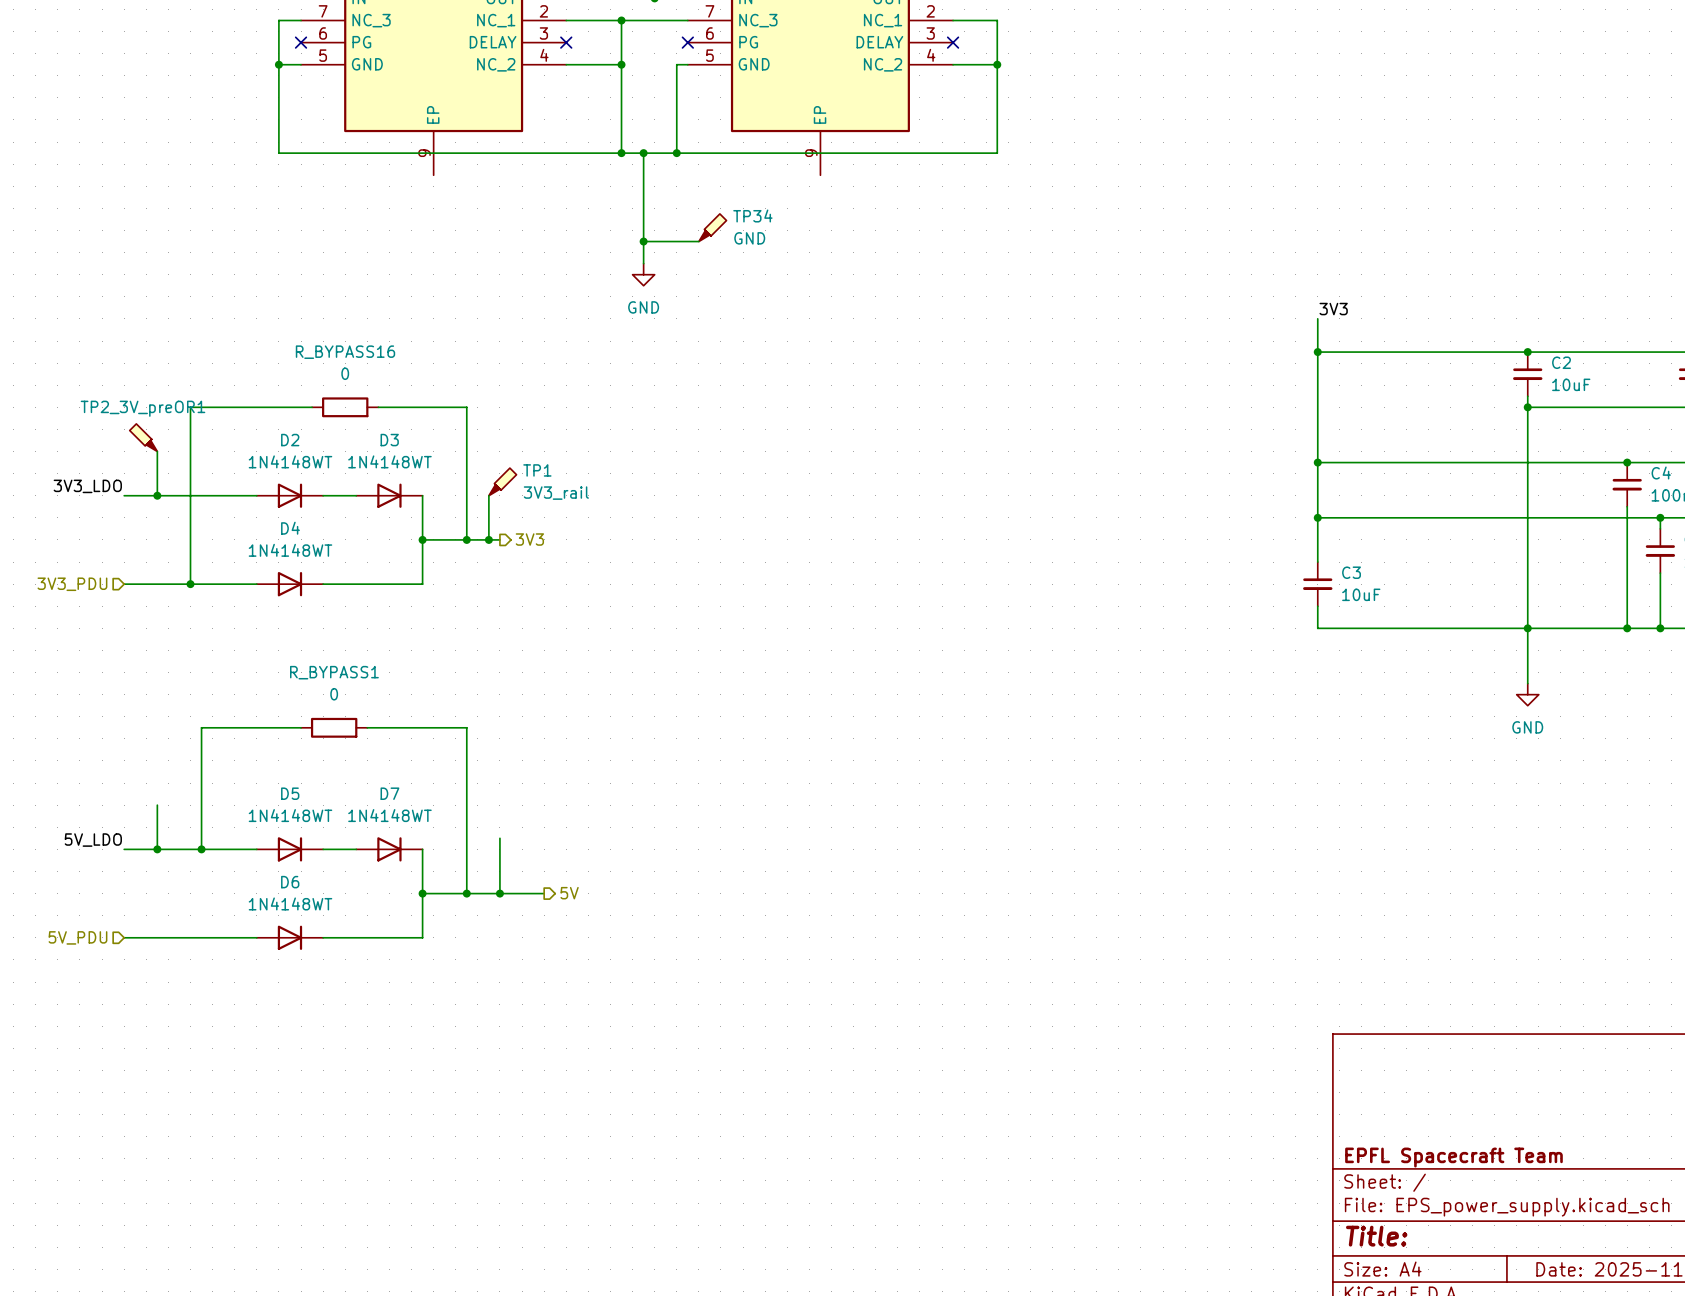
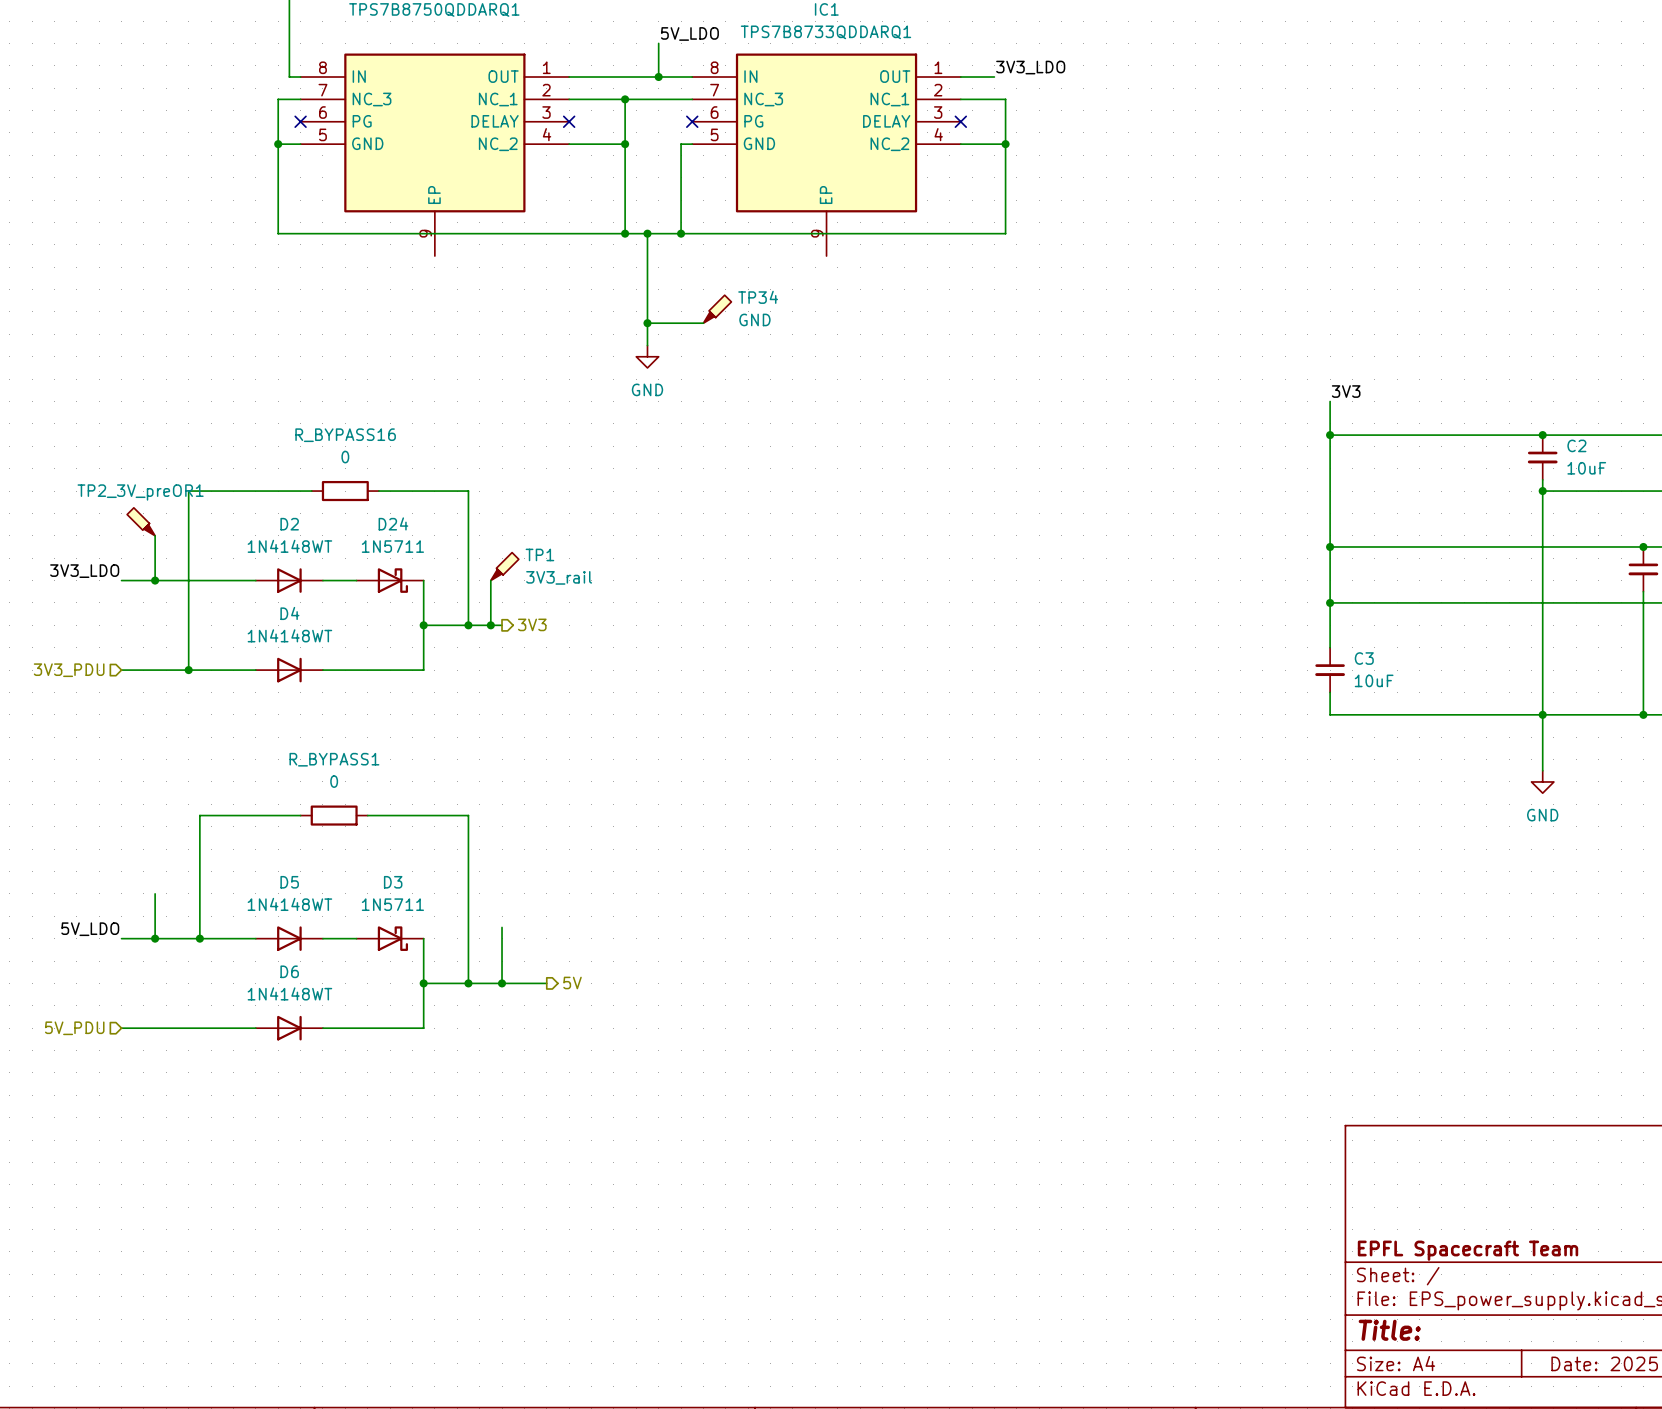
D3 value: 1N4148WT (389, 461) -> 1N5711 (392, 904)
D3 symbol: [356, 483, 423, 508] -> [356, 926, 424, 951]
D24: none -> 1N5711 (390, 580)
D7: 1N4148WT (389, 849) -> none

